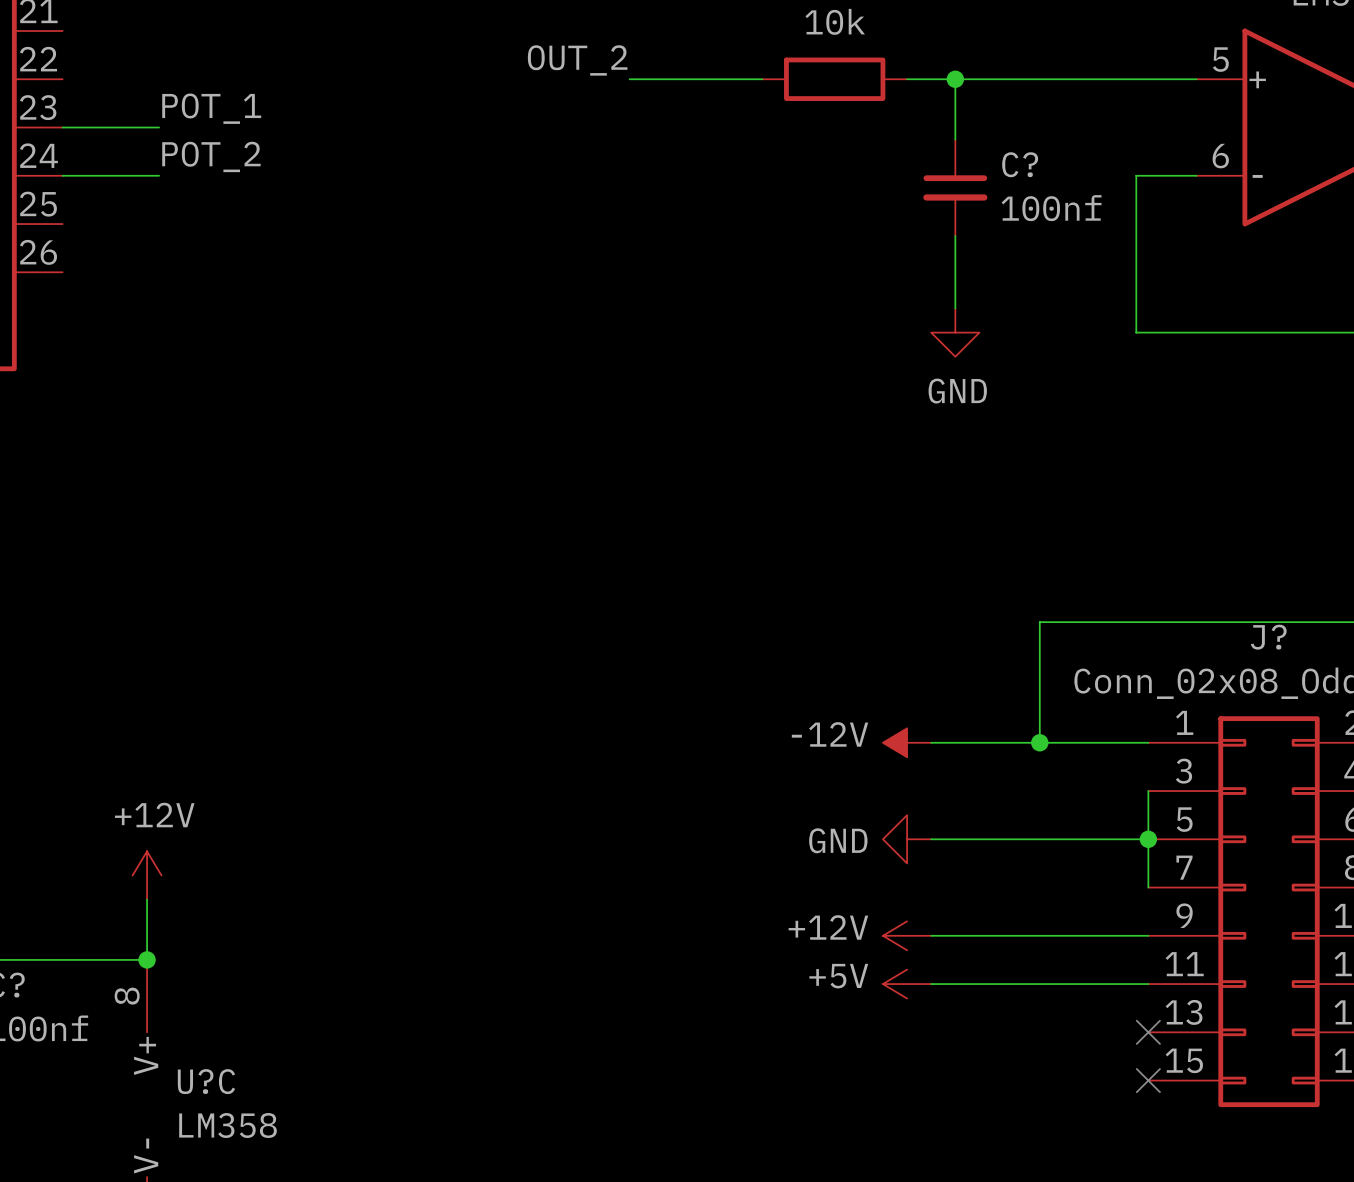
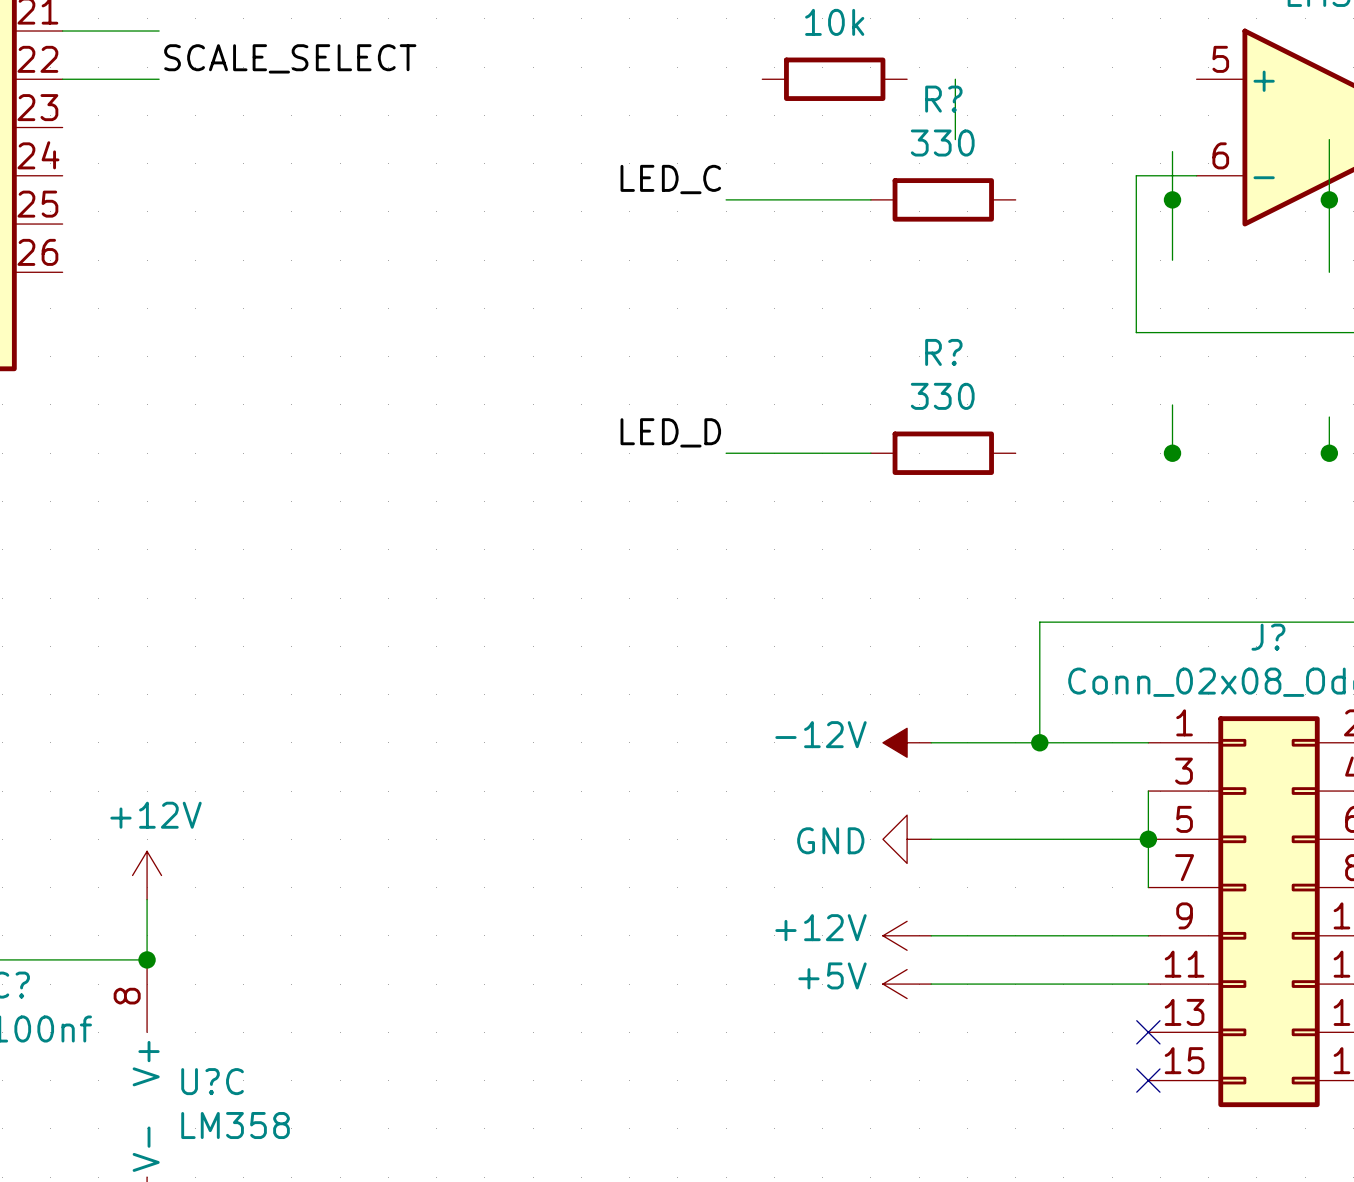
label: none -> SCALE_SELECT (290, 58)
label: OUT_2 (577, 60) -> none
wire: (629, 79) (762, 79) -> none
wire: (907, 79) (1196, 79) -> none
junction: (955, 79) -> none
label: POT_1 (211, 108) -> none
wire: (62, 127) (159, 127) -> (62, 31) (159, 31)
wire: none -> (1329, 139) (1329, 272)
wire: none -> (1172, 151) (1172, 260)
label: POT_2 (211, 156) -> none
wire: (62, 175) (159, 175) -> (62, 79) (159, 79)
label: none -> LED_C (670, 179)
C?: 100nf (955, 187) -> none
wire: none -> (726, 199) (870, 199)
R?: none -> 330 (943, 199)
junction: none -> (1172, 199)
junction: none -> (1329, 199)
wire: (955, 236) (955, 308) -> none
power symbol: GND (955, 332) -> none
wire: none -> (1172, 404) (1172, 453)
wire: none -> (1329, 417) (1329, 453)
label: none -> LED_D (670, 432)
wire: none -> (726, 453) (870, 453)
R?: none -> 330 (943, 453)
junction: none -> (1172, 453)
junction: none -> (1329, 453)

